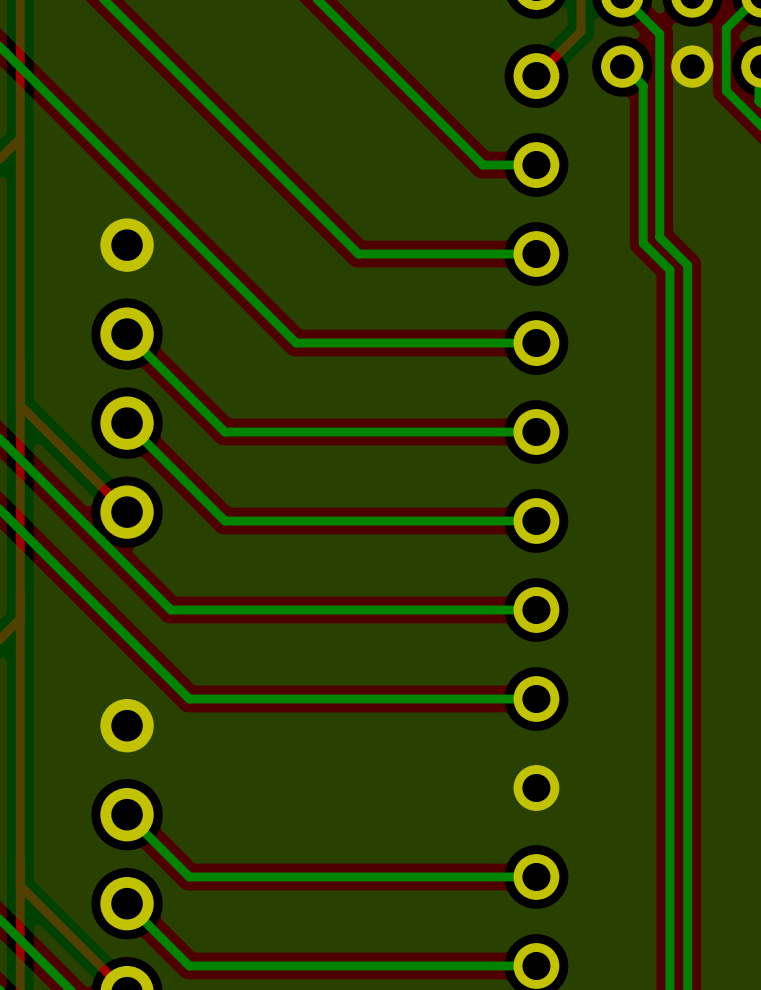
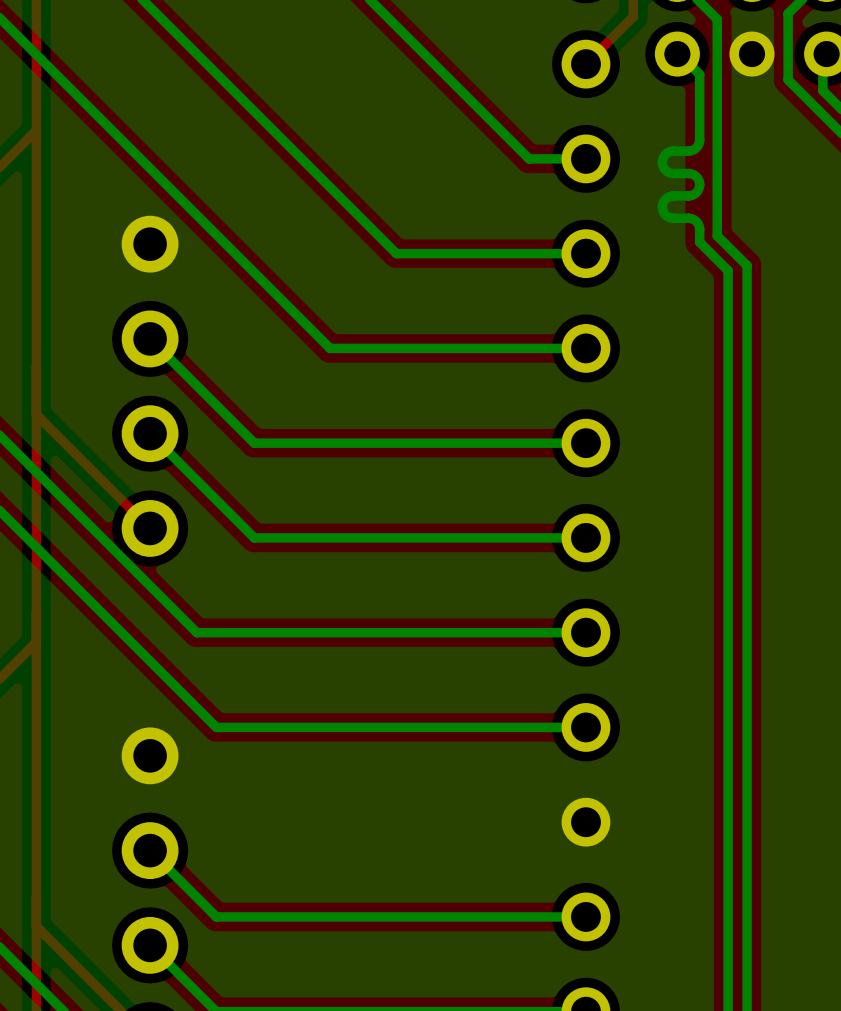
bottom track: (643, 147) (643, 231) -> (699, 139) (694, 149) (669, 151) (664, 155) (662, 162) (663, 167) (669, 172) (691, 173) (698, 179) (699, 186) (695, 193) (689, 195) (669, 196) (663, 201) (662, 207) (667, 216) (692, 219) (698, 223) (699, 229)

